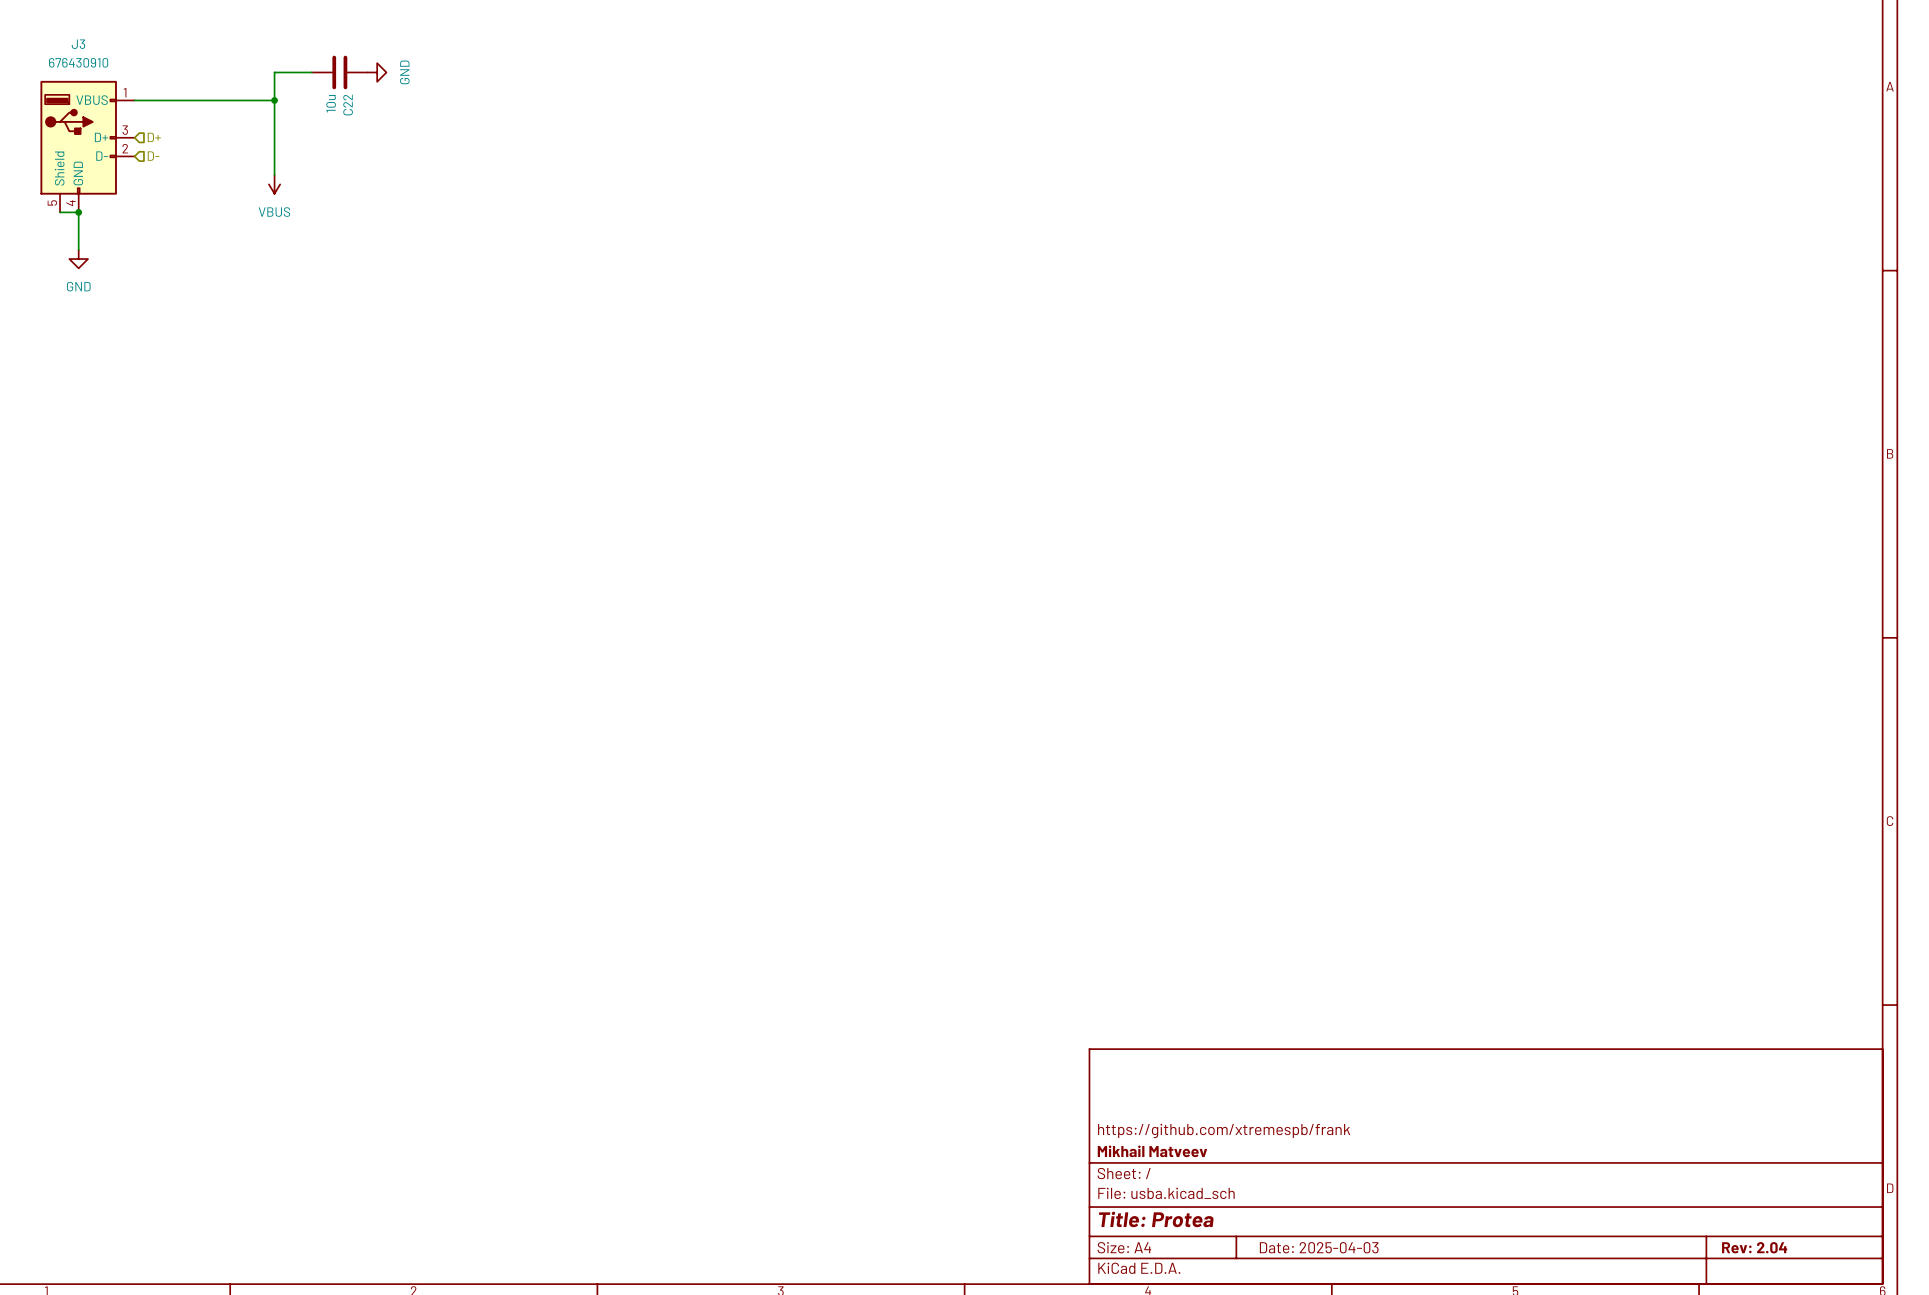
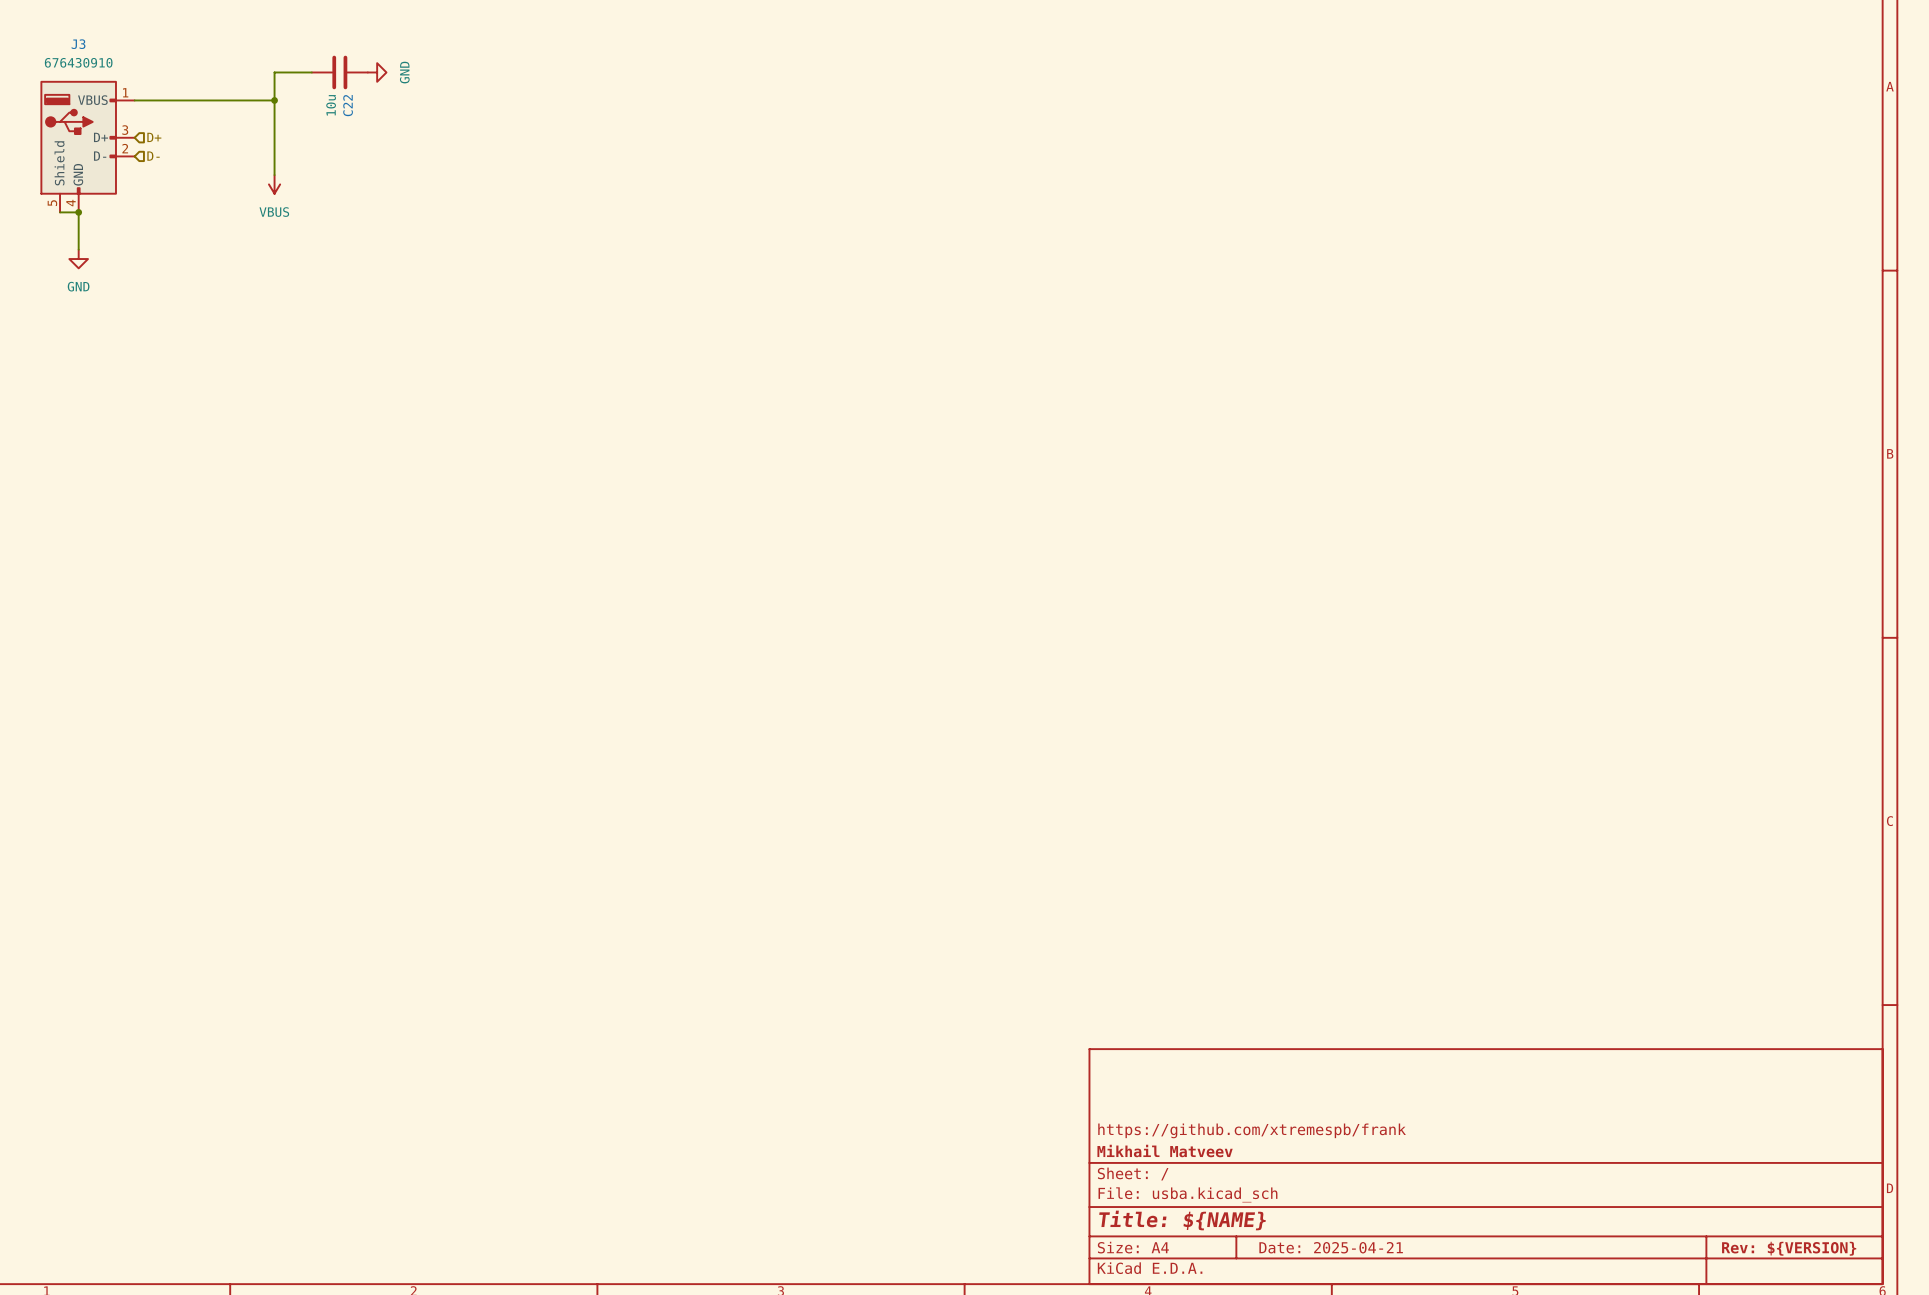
title block: Title: Protea (1156, 1219) -> Title: ${NAME} (1182, 1220)
title block: Date: 2025-04-03 (1319, 1247) -> Date: 2025-04-21 (1331, 1247)
title block: Rev: 2.04 (1754, 1247) -> Rev: ${VERSION} (1789, 1248)

